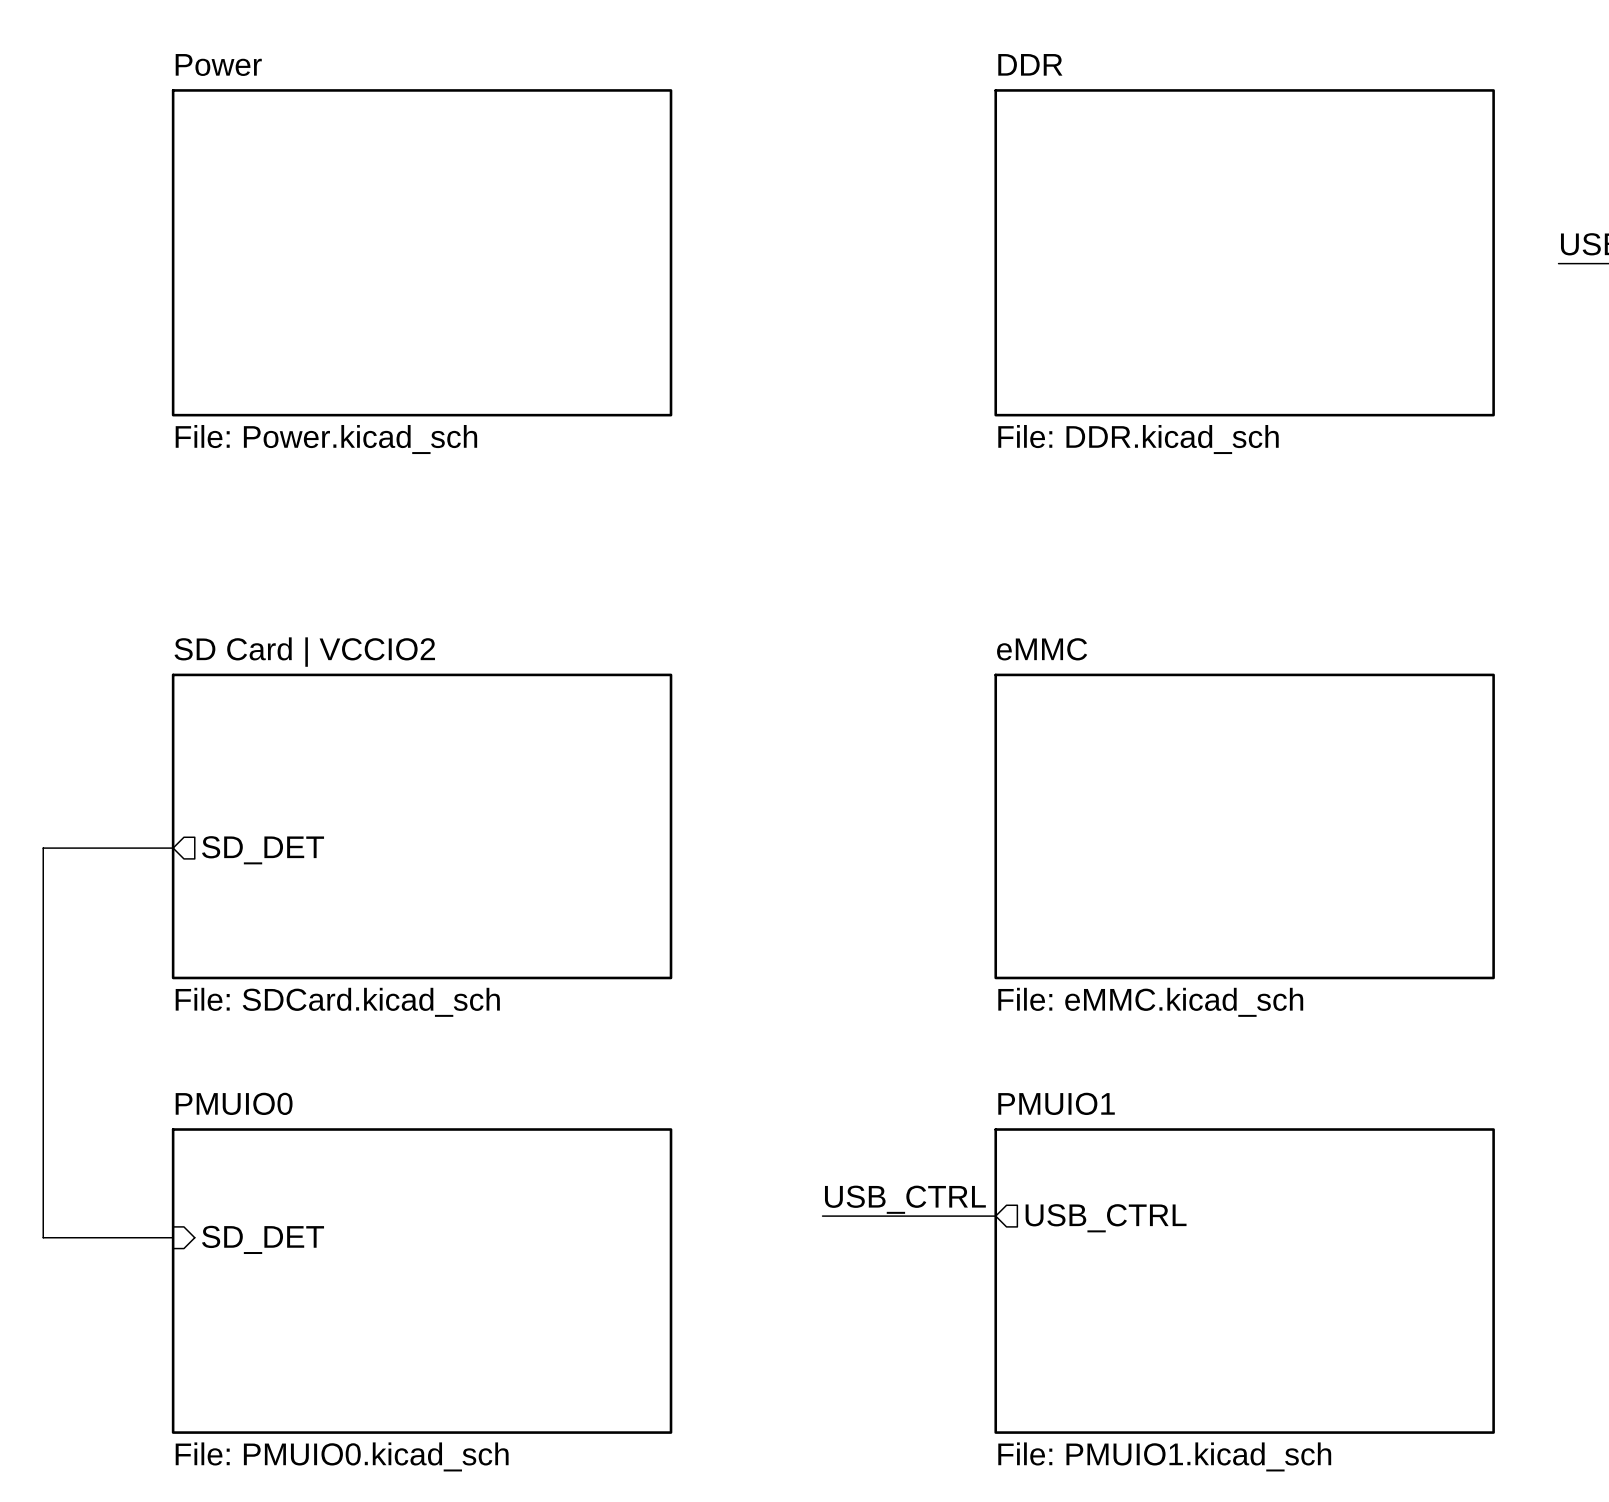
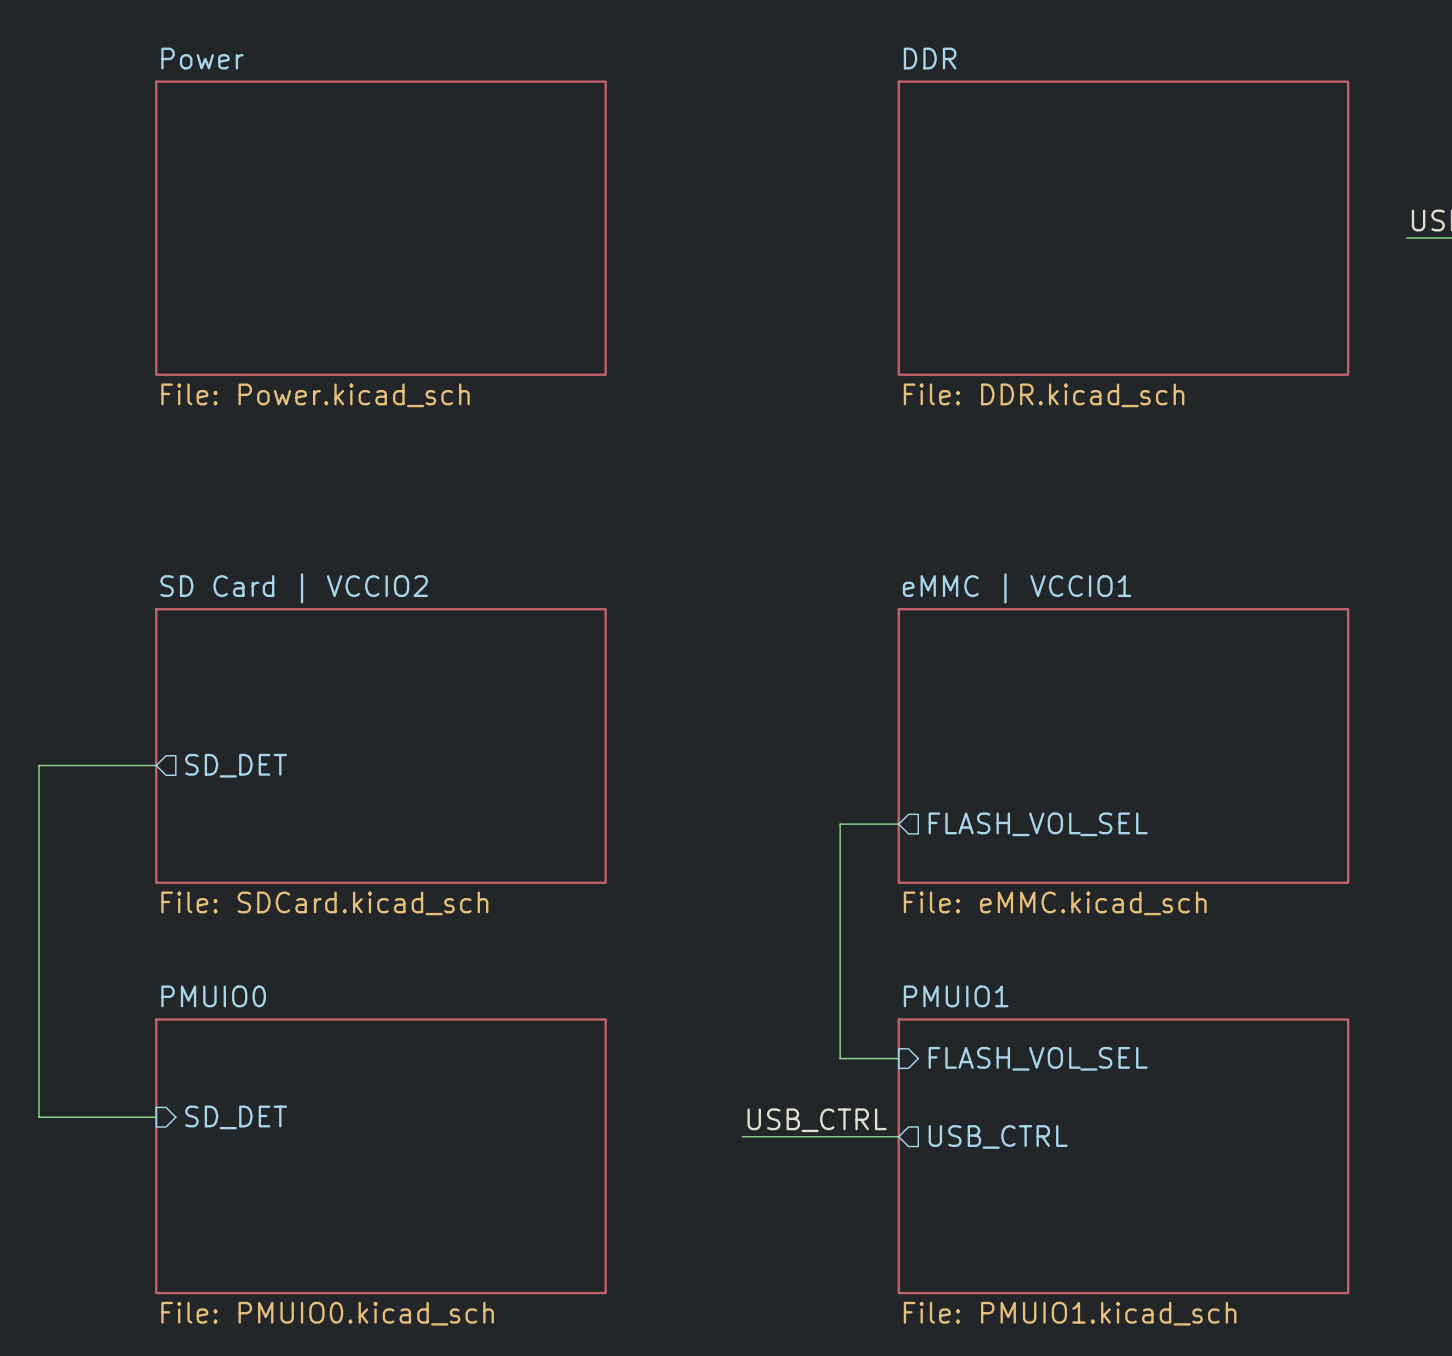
sheet eMMC name: eMMC (1042, 649) -> eMMC | VCCIO1 (1017, 588)
wire: none -> (898, 824) (840, 824) (840, 1058) (898, 1058)
sheet pin: none -> FLASH_VOL_SEL (1038, 824)
sheet pin: none -> FLASH_VOL_SEL (1038, 1058)
label position: USB_CTRL (905, 1199) -> USB_CTRL (817, 1120)
wire: (822, 1216) (995, 1216) -> (742, 1136) (898, 1136)
sheet pin position: USB_CTRL (1106, 1218) -> USB_CTRL (998, 1136)

